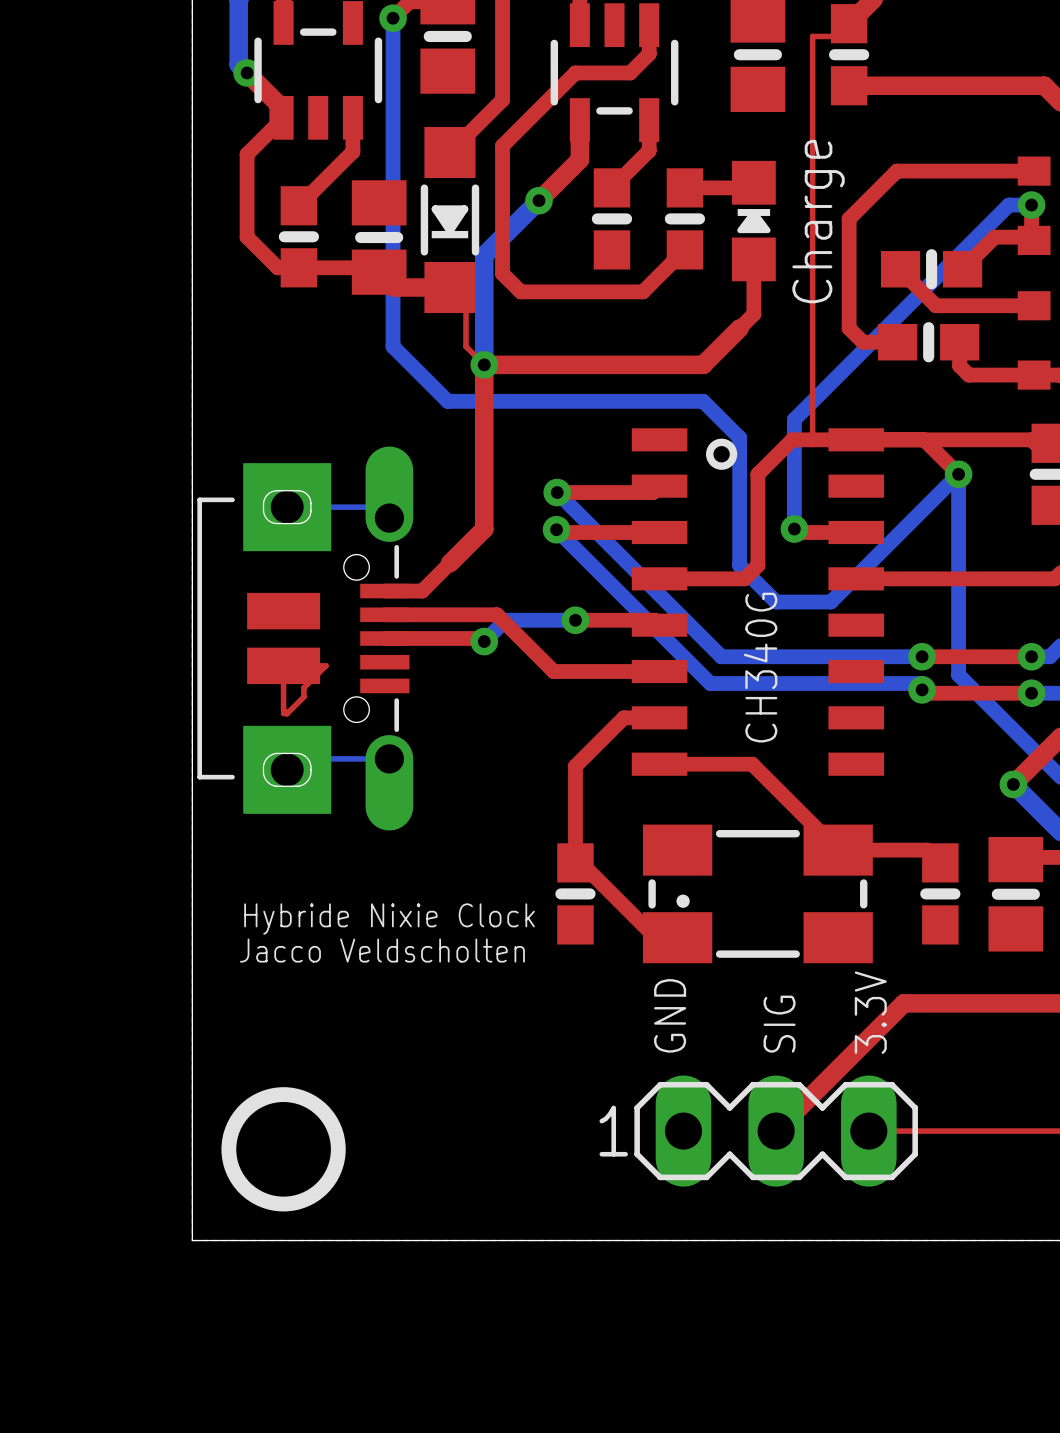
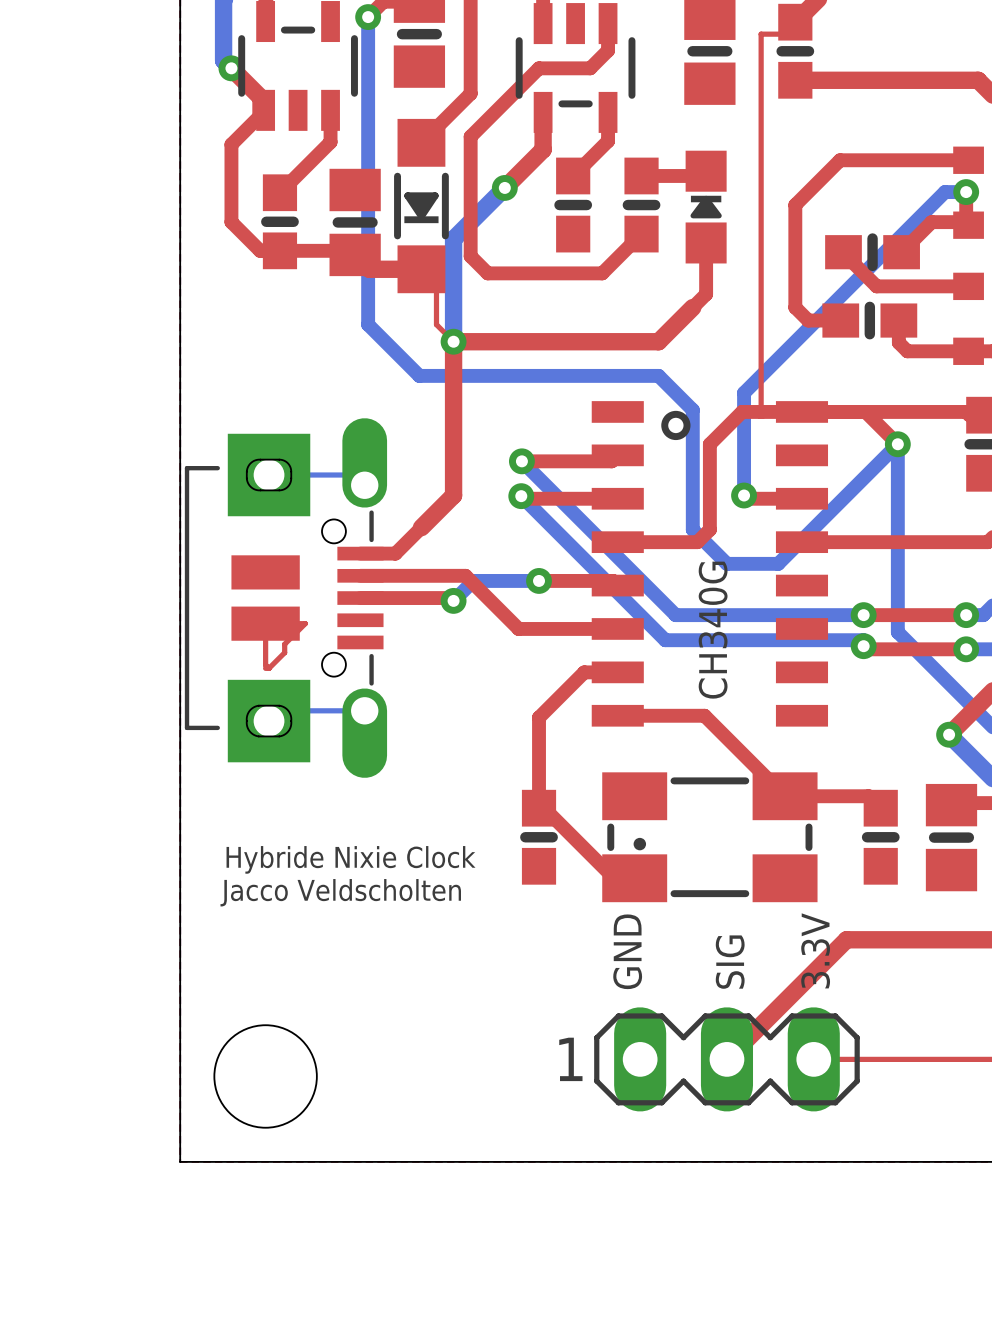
text: Charge (818, 221) -> none
drawing: [221, 1087, 346, 1212] -> none

